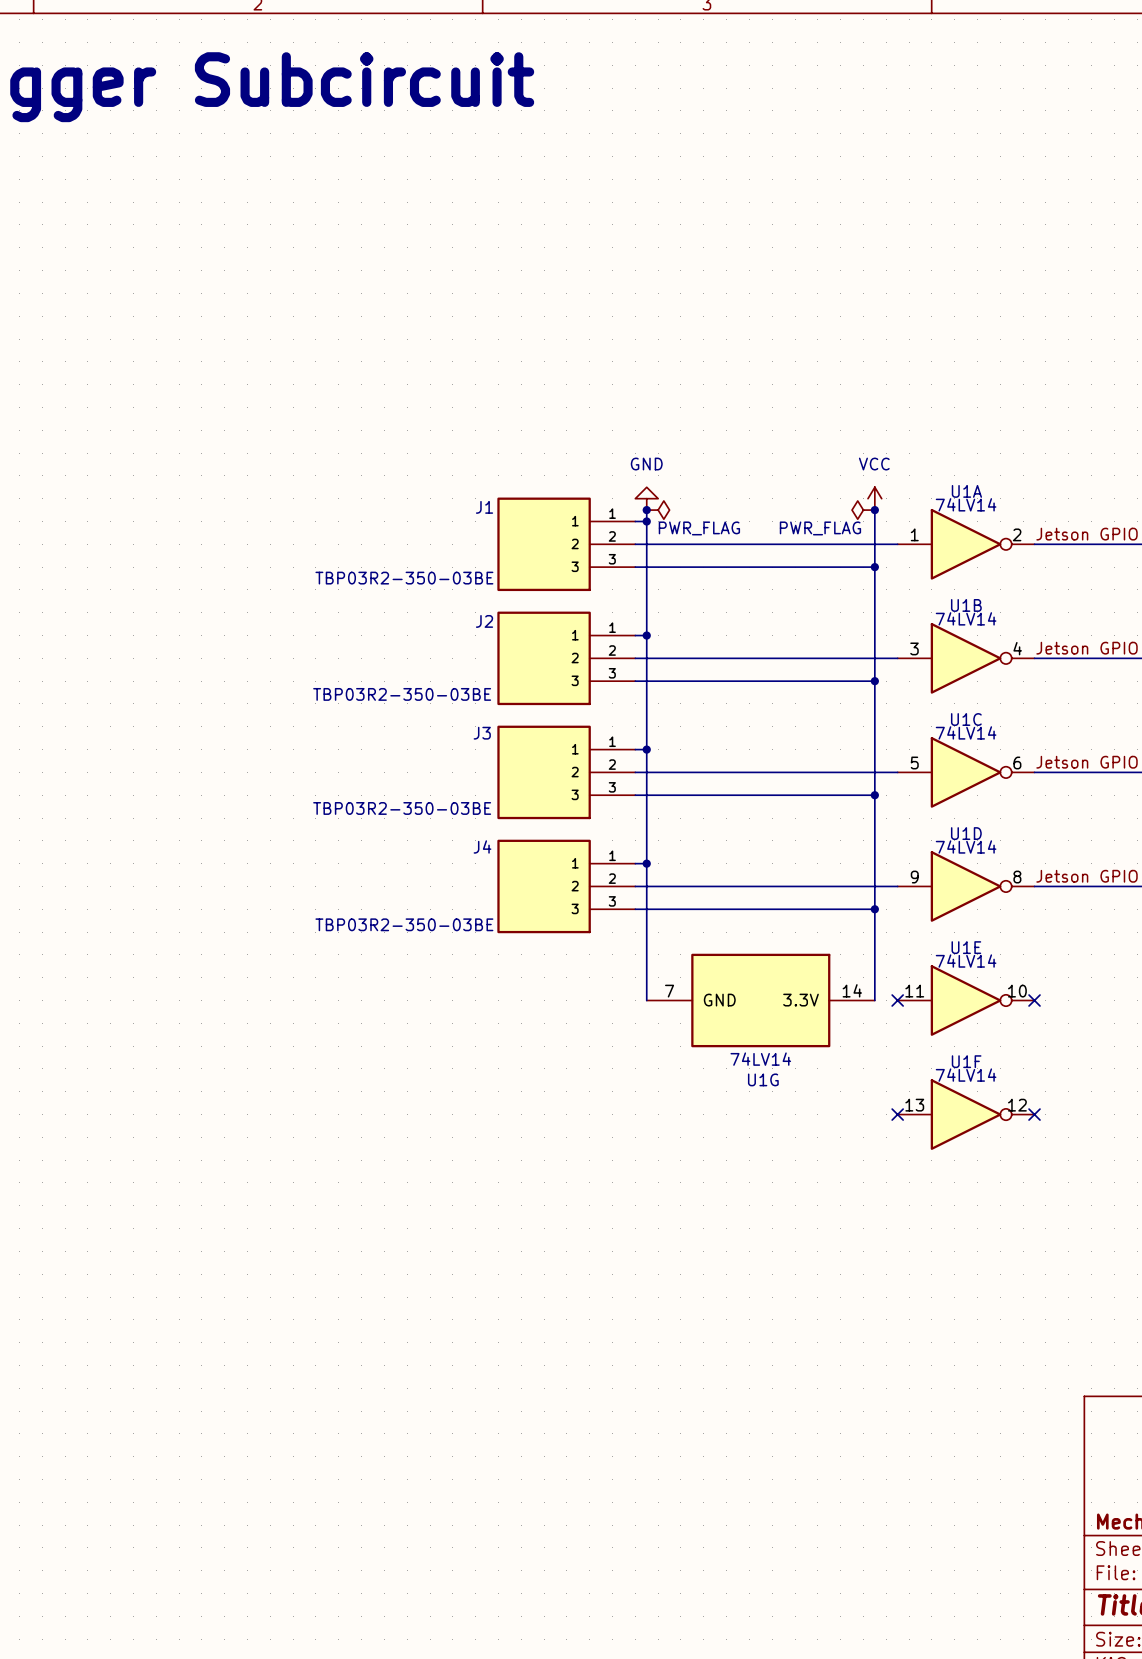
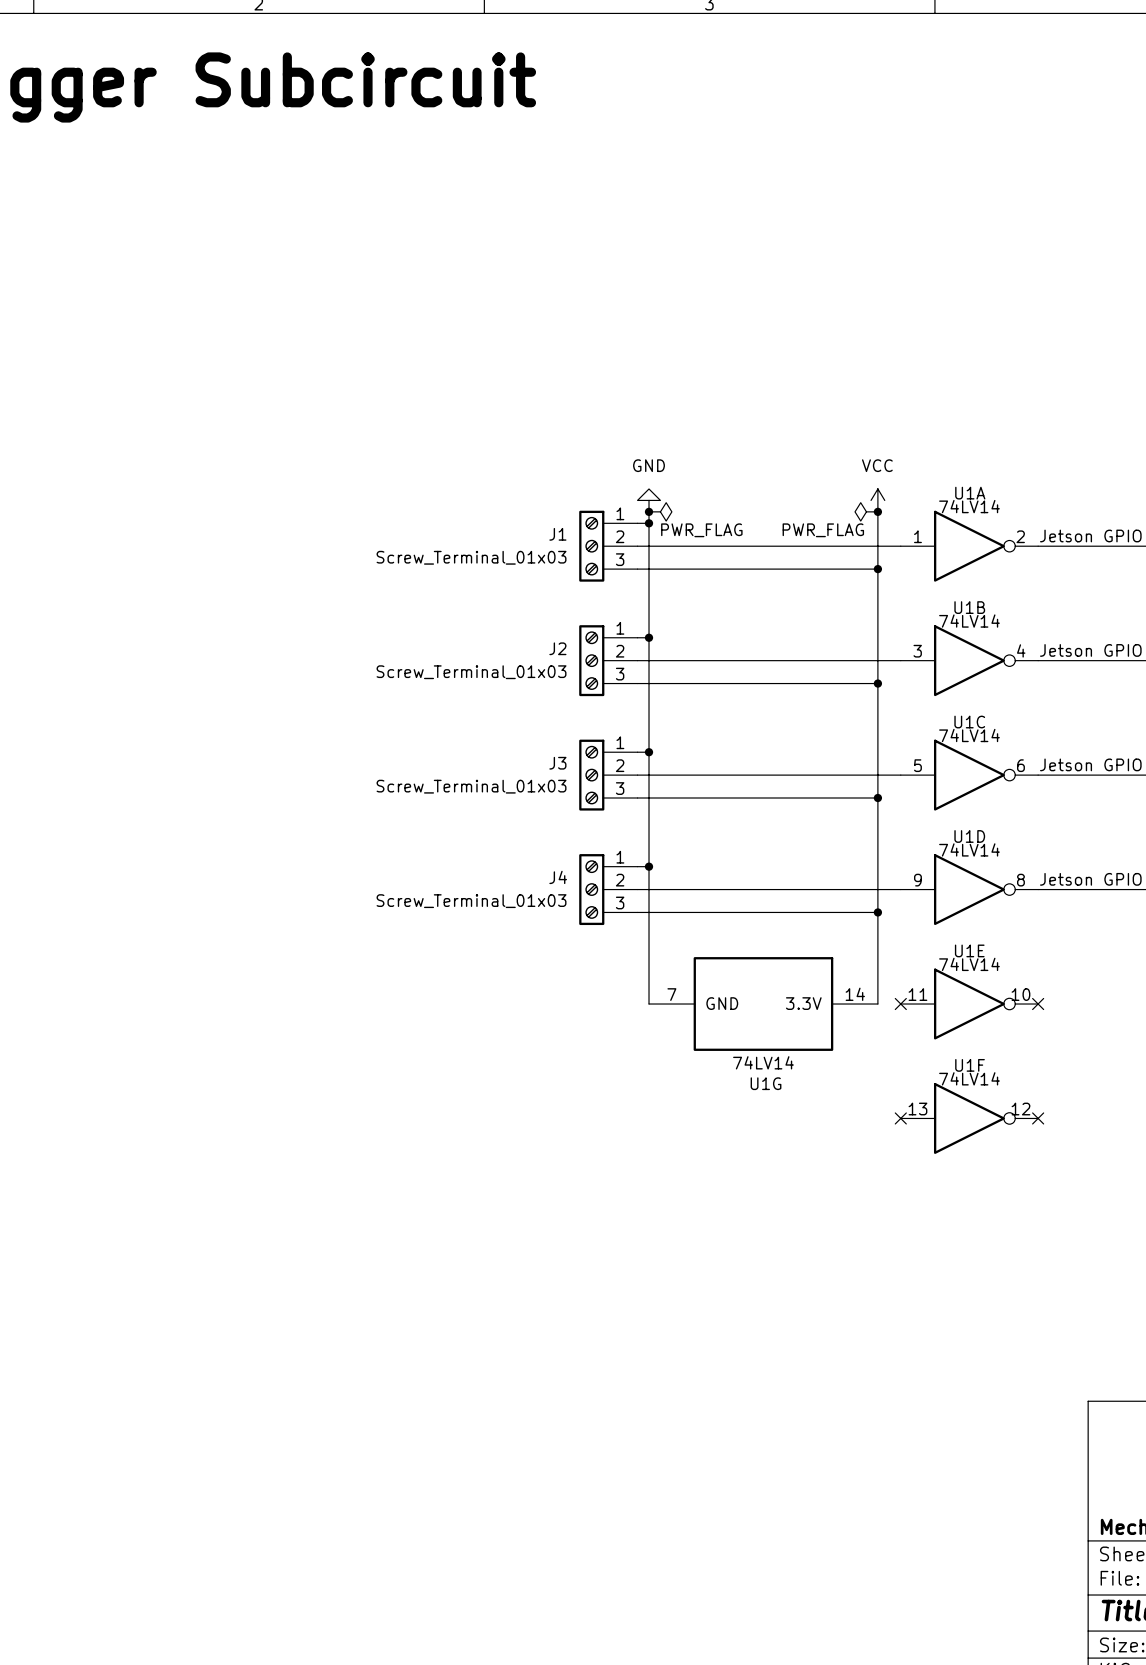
J1 symbol: [497, 497, 636, 592] -> [579, 510, 638, 582]
J1 name position: J1 (484, 507) -> J1 (557, 534)
J1 value: TBP03R2-350-03BE (404, 578) -> Screw_Terminal_01x03 (471, 557)
J2 symbol: [497, 611, 636, 706] -> [579, 625, 638, 697]
J2 name position: J2 (484, 621) -> J2 (557, 648)
J2 value: TBP03R2-350-03BE (402, 694) -> Screw_Terminal_01x03 (471, 672)
J3 symbol: [497, 725, 636, 820] -> [579, 739, 638, 811]
J3 name position: J3 (482, 733) -> J3 (557, 763)
J3 value: TBP03R2-350-03BE (402, 808) -> Screw_Terminal_01x03 (471, 786)
J4 symbol: [497, 839, 636, 934] -> [579, 854, 638, 926]
J4 name position: J4 (482, 846) -> J4 (558, 877)
J4 value: TBP03R2-350-03BE (404, 924) -> Screw_Terminal_01x03 (471, 901)

